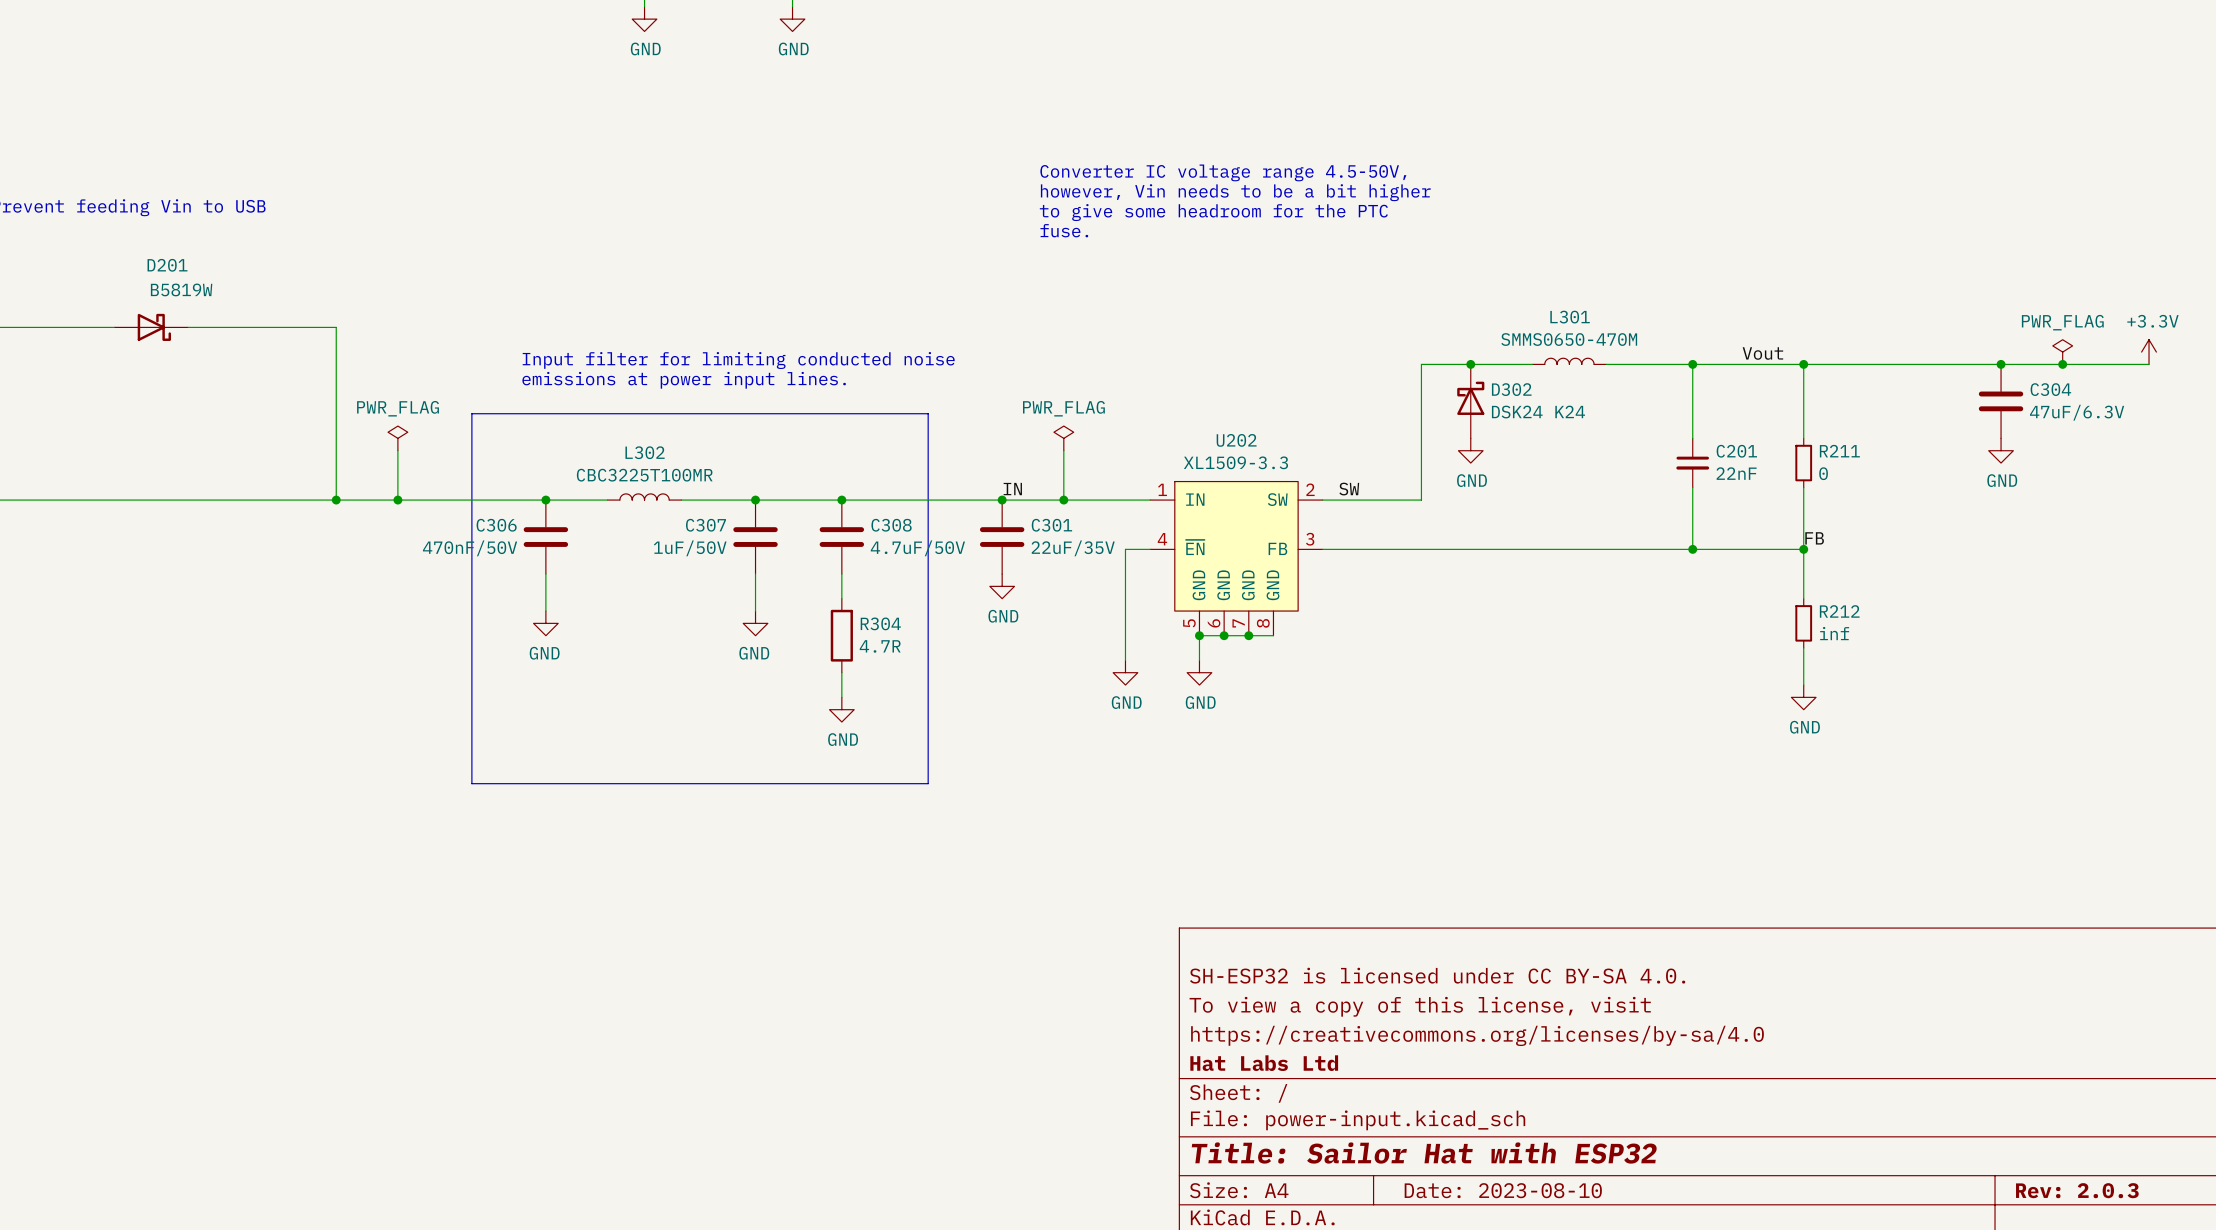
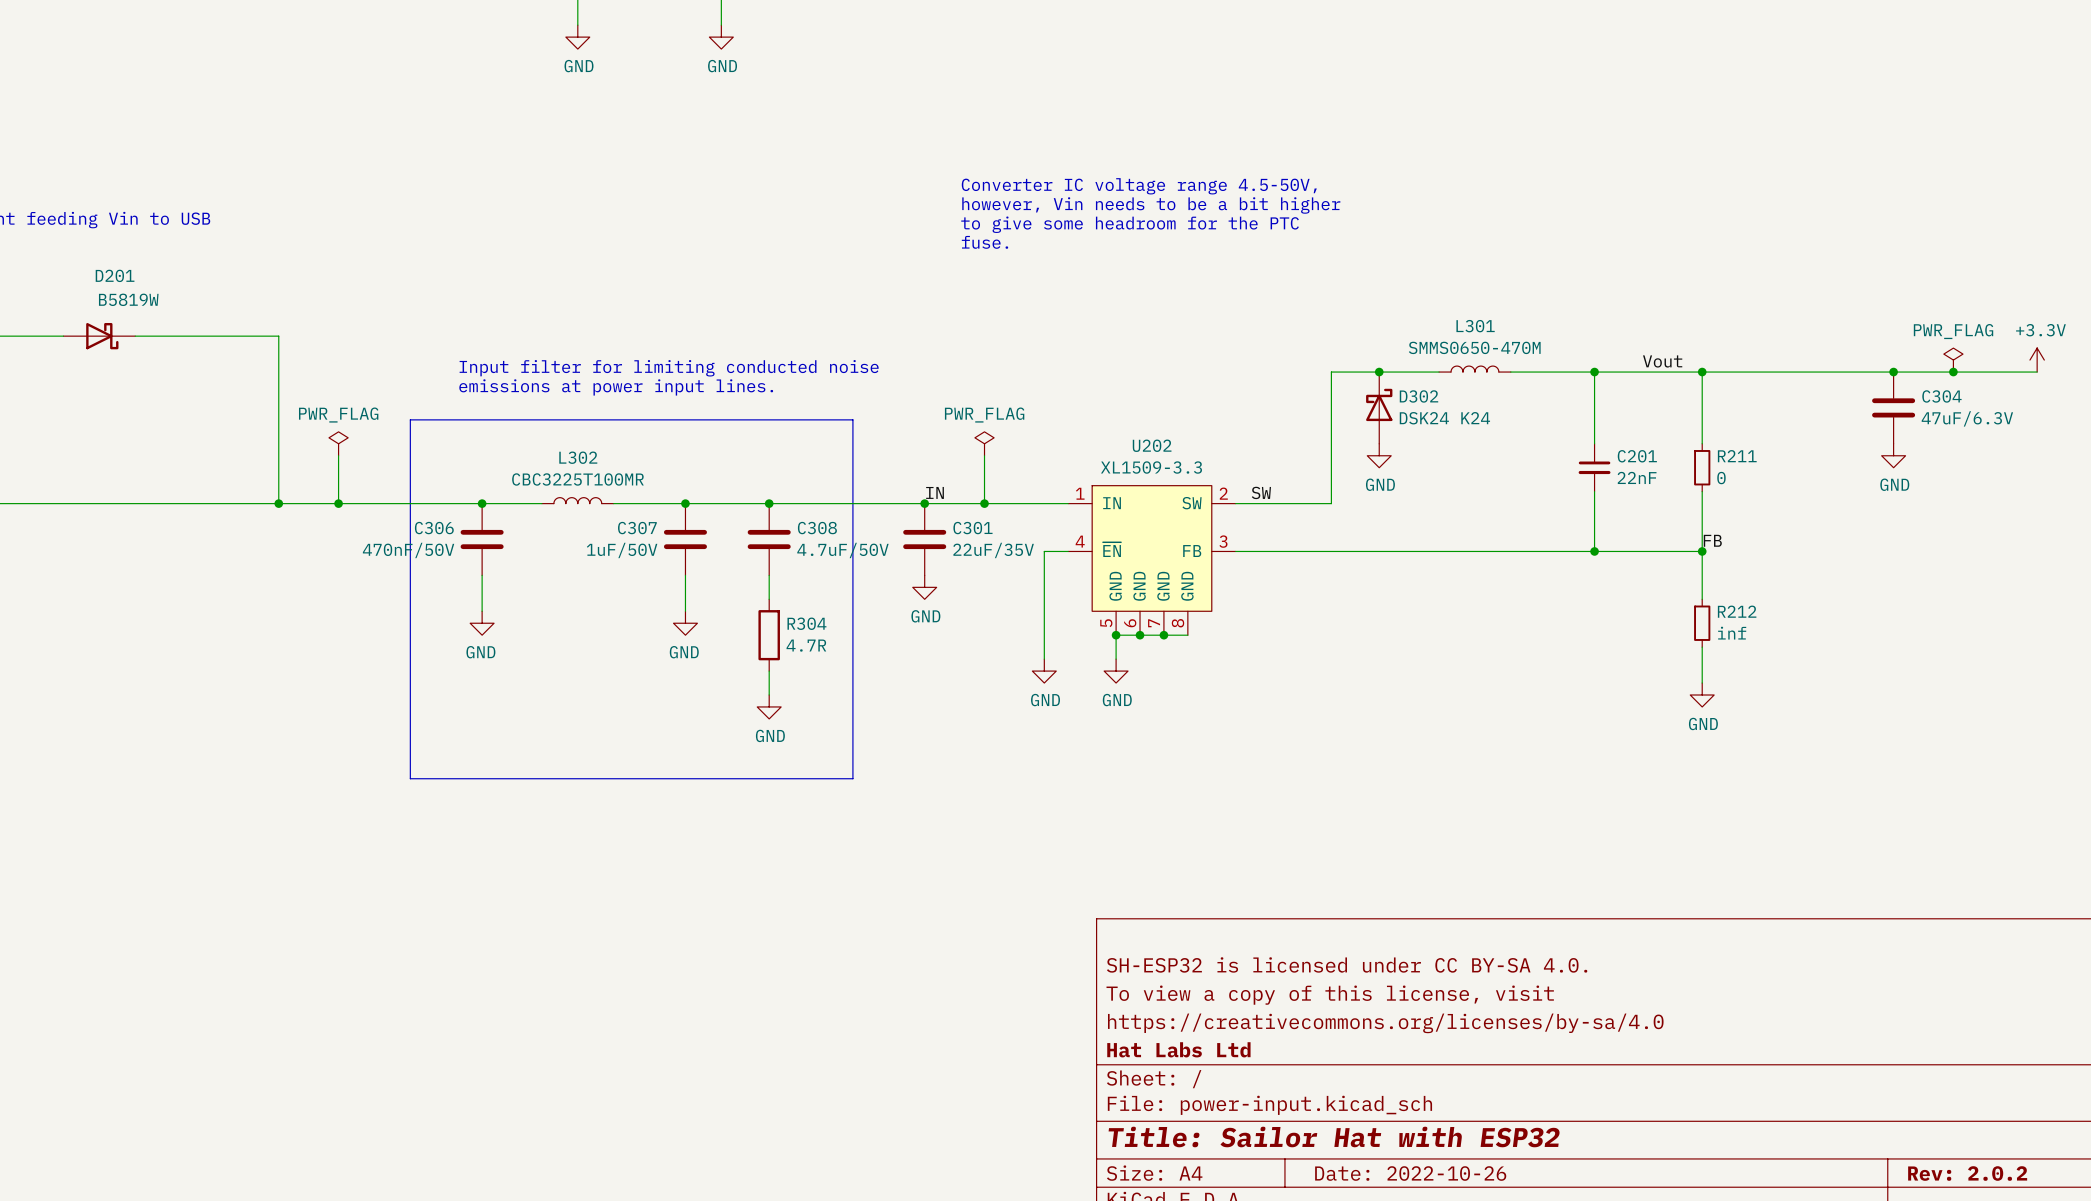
title block: Date: 2023-08-10 (1503, 1190) -> Date: 2022-10-26 (1410, 1173)
title block: Rev: 2.0.3 (2077, 1190) -> Rev: 2.0.2 (1967, 1173)

